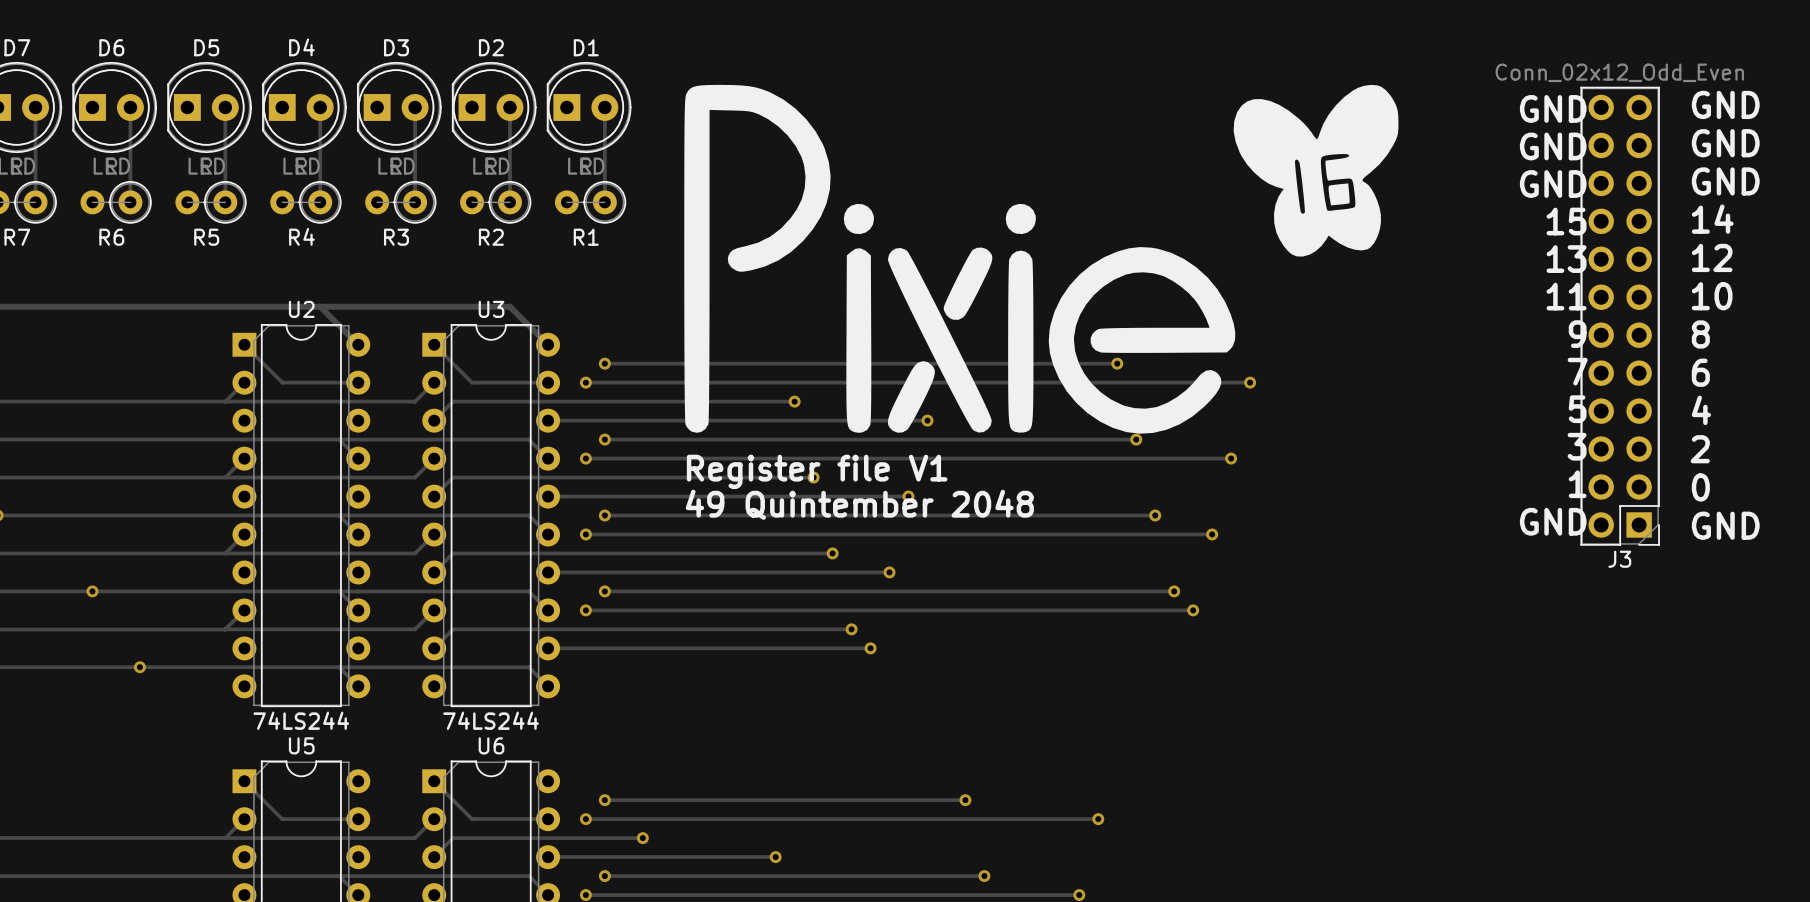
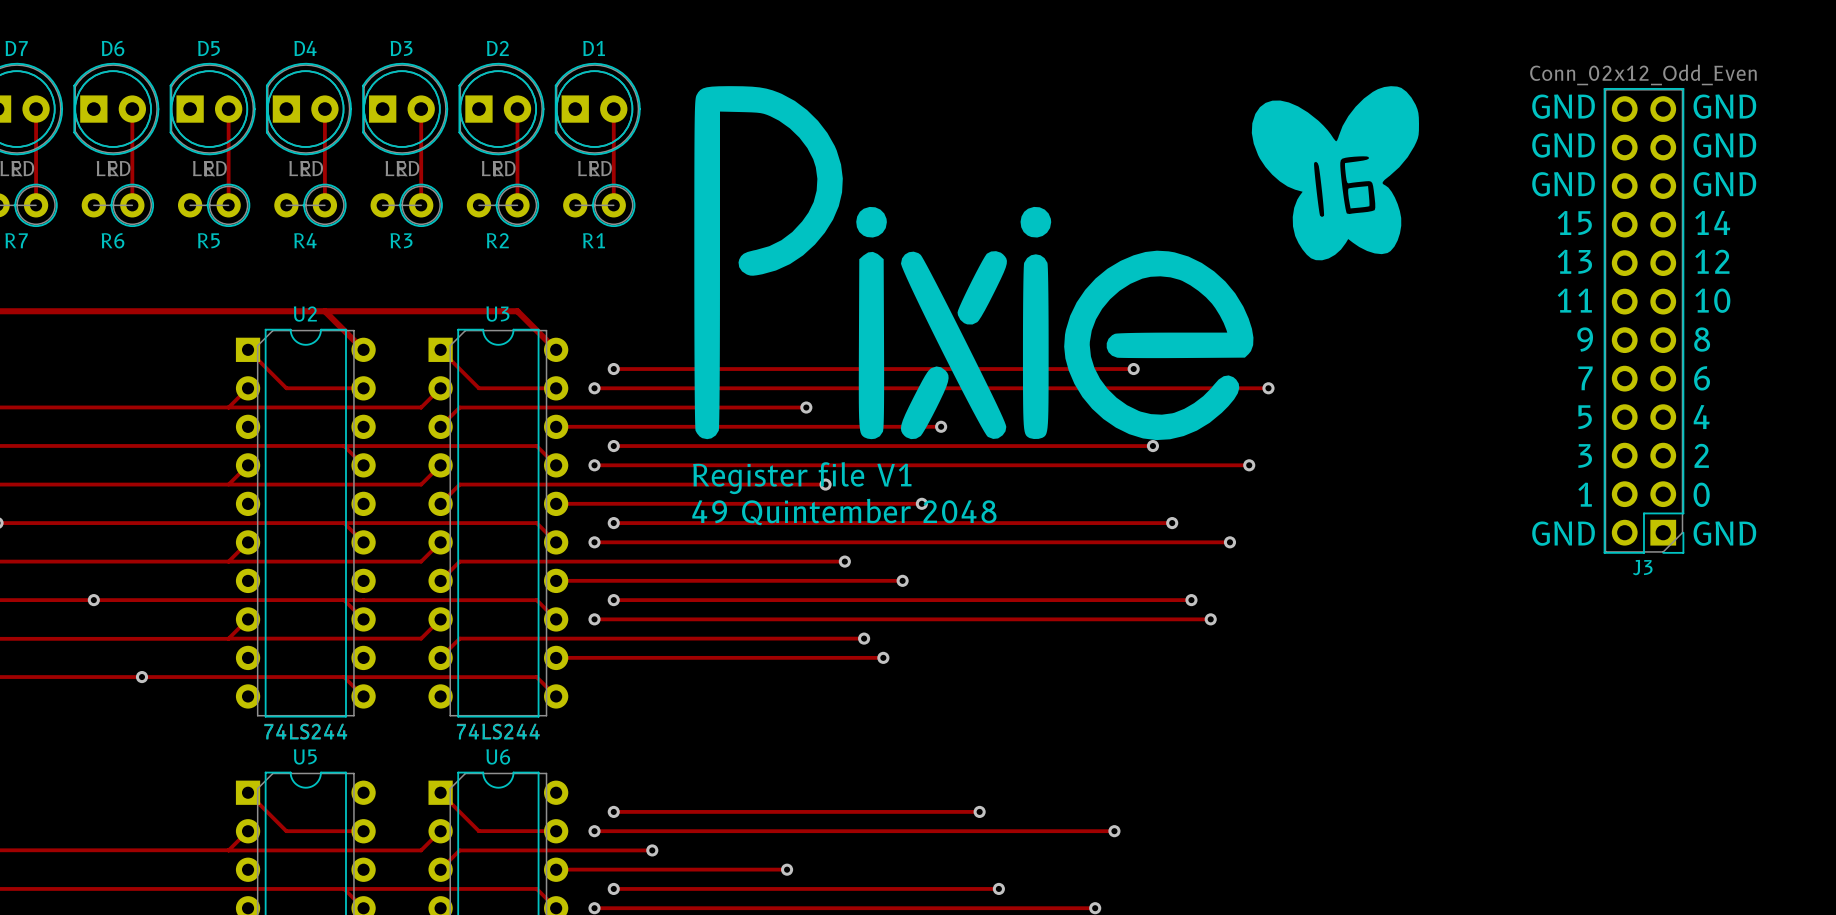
text position: GND (1725, 104) -> GND (1724, 106)
text position: GND (1553, 108) -> GND (1563, 106)
text position: GND (1725, 143) -> GND (1724, 145)
text position: GND (1553, 146) -> GND (1563, 145)
text position: GND (1725, 181) -> GND (1724, 184)
text position: GND (1553, 184) -> GND (1563, 184)
text position: 14 (1712, 219) -> 14 (1712, 222)
text position: 15 (1566, 221) -> 15 (1574, 222)
text position: 12 (1712, 257) -> 12 (1712, 261)
text position: 13 (1566, 259) -> 13 (1574, 261)
text position: 11 (1566, 296) -> 11 (1574, 300)
text position: 10 (1712, 296) -> 10 (1712, 300)
text position: 9 (1577, 334) -> 9 (1585, 339)
text position: 8 (1700, 334) -> 8 (1702, 339)
text position: 7 (1577, 371) -> 7 (1585, 378)
text position: 6 (1700, 372) -> 6 (1702, 378)
text position: 5 (1577, 409) -> 5 (1585, 417)
text position: 4 (1701, 410) -> 4 (1701, 417)
text position: 3 (1577, 446) -> 3 (1585, 455)
text position: 2 (1700, 449) -> 2 (1701, 455)
text position: 1 (1577, 484) -> 1 (1585, 494)
text position: 0 (1700, 487) -> 0 (1701, 494)
text position: GND (1553, 521) -> GND (1563, 533)
text position: GND (1725, 525) -> GND (1724, 533)

